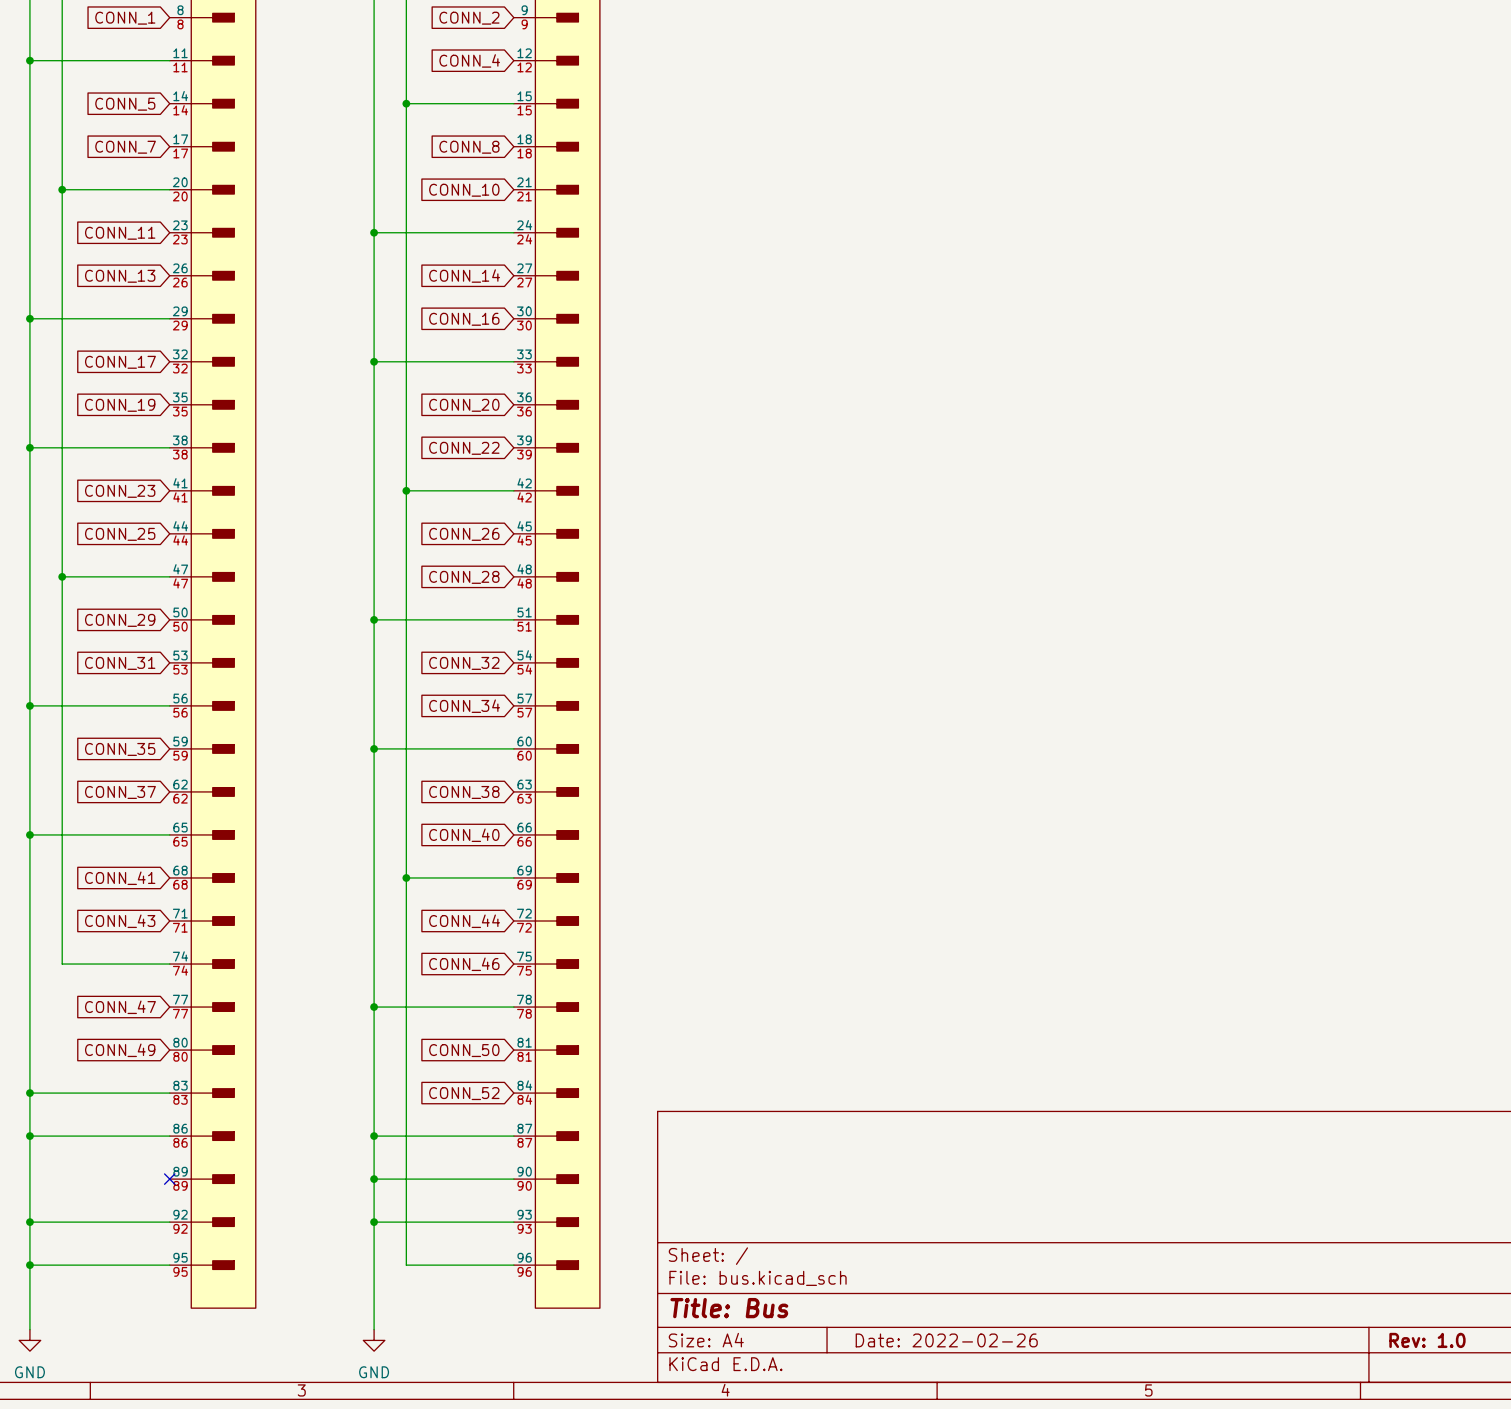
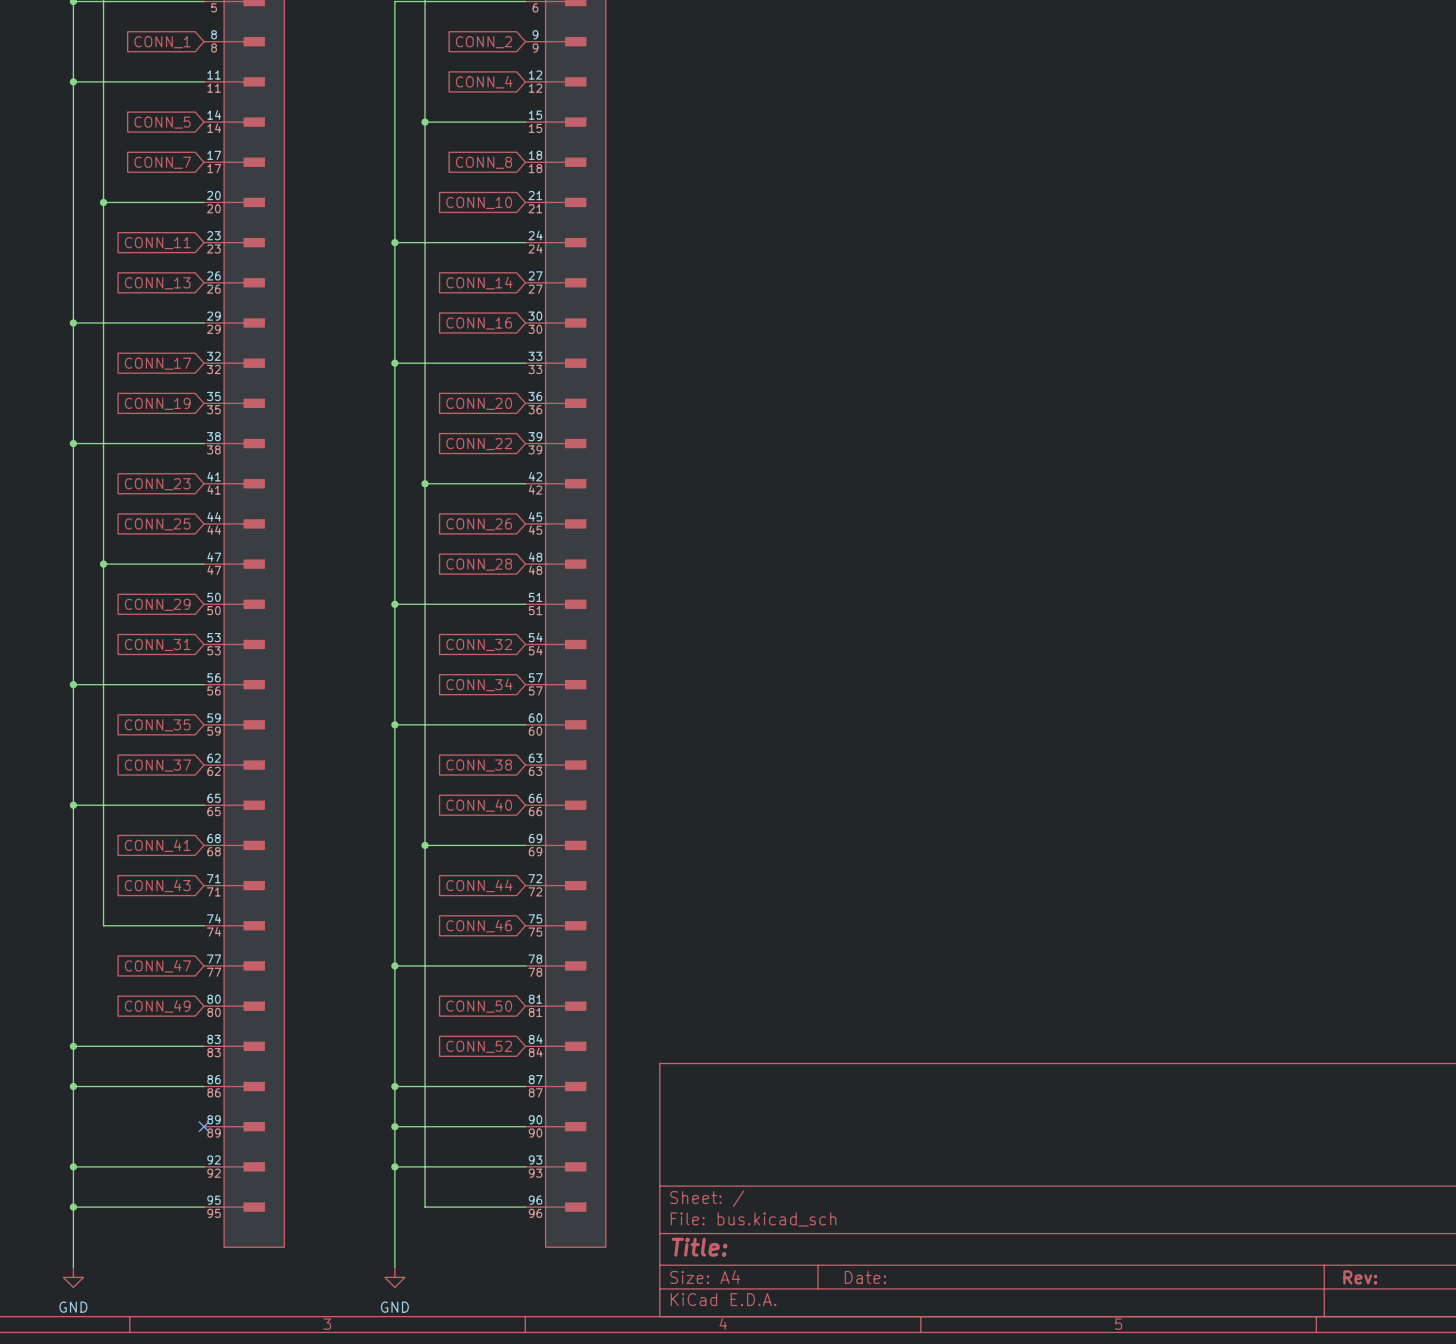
title block: Title: Bus (729, 1308) -> Title: (699, 1247)
title block: Date: 2022-02-26 (946, 1340) -> Date: (865, 1277)
title block: Rev: 1.0 (1427, 1340) -> Rev: (1360, 1277)

